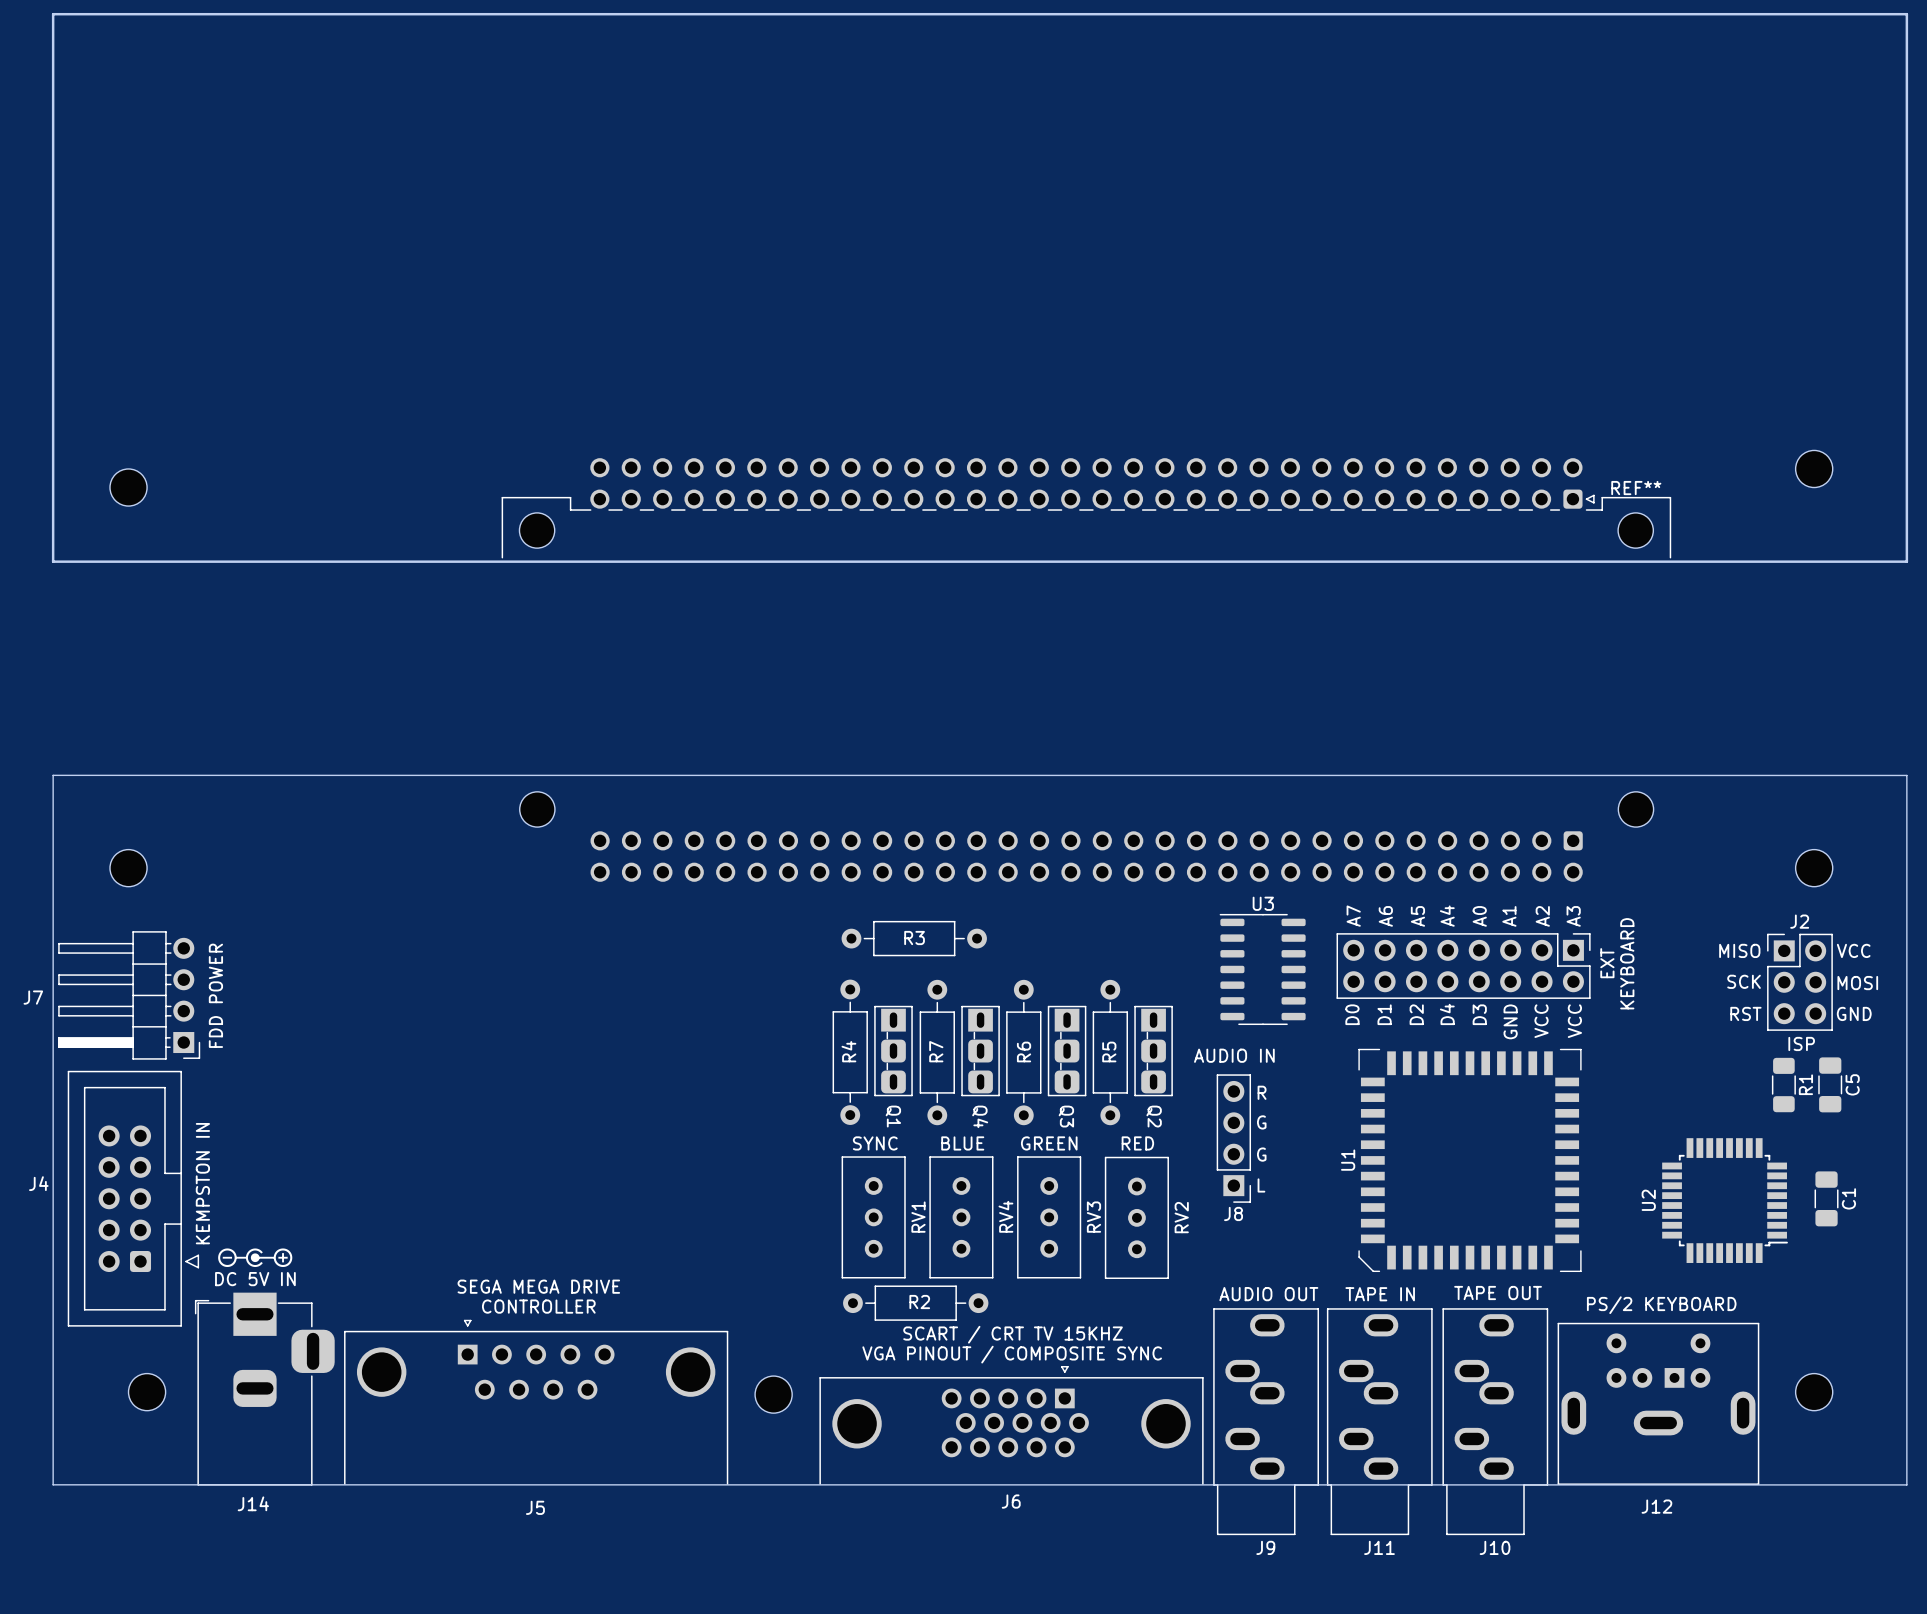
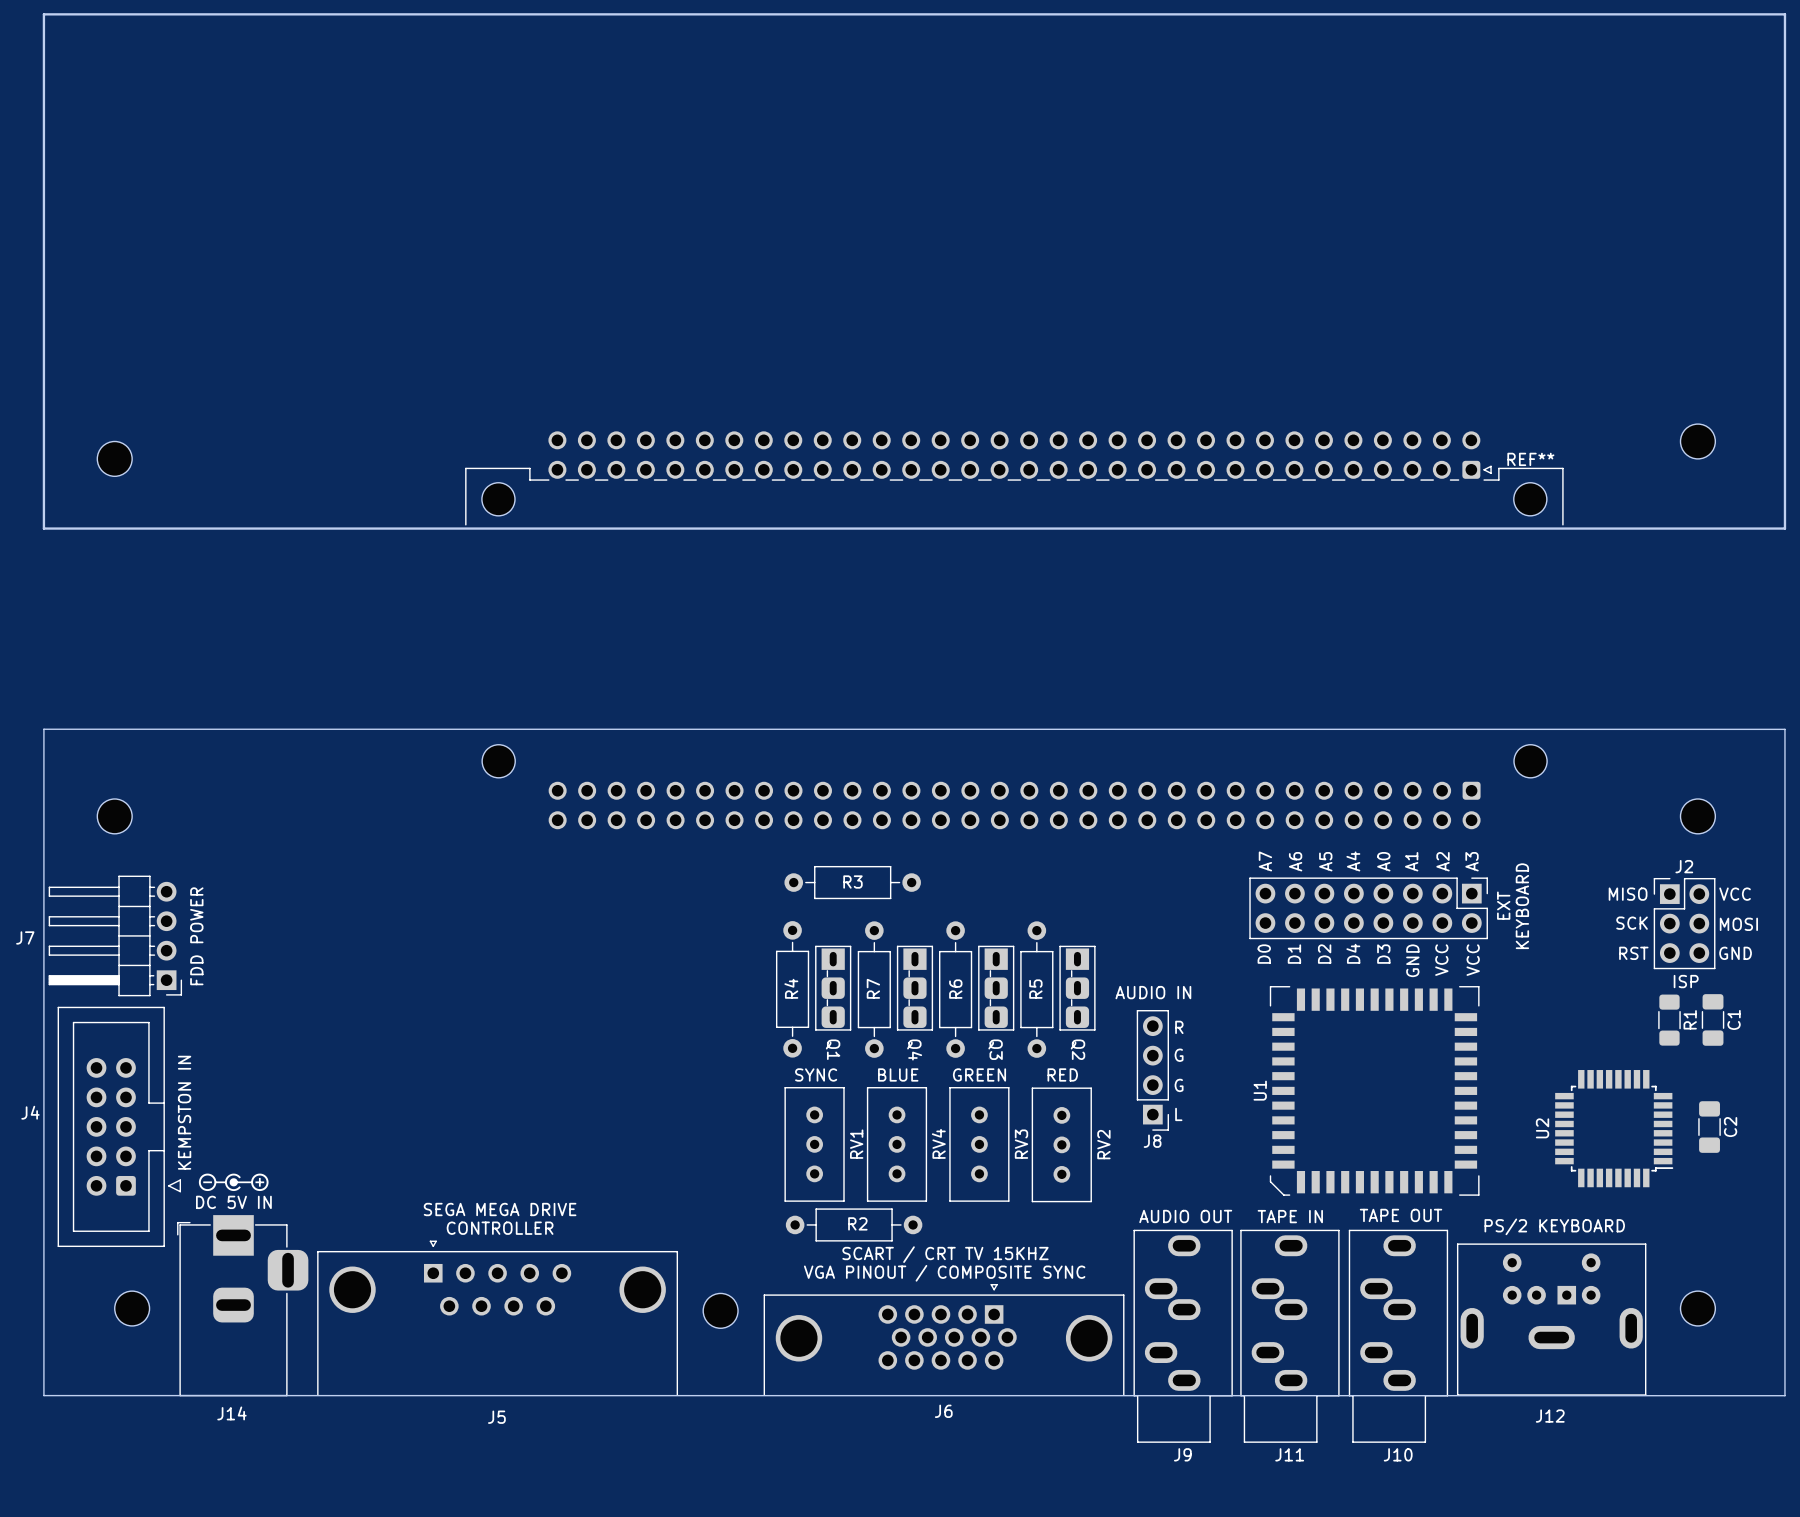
U3: (1262, 969) -> none
C5 name: C5 (1852, 1084) -> C1 (1734, 1019)
C1 name: C1 (1848, 1198) -> C2 (1730, 1127)

